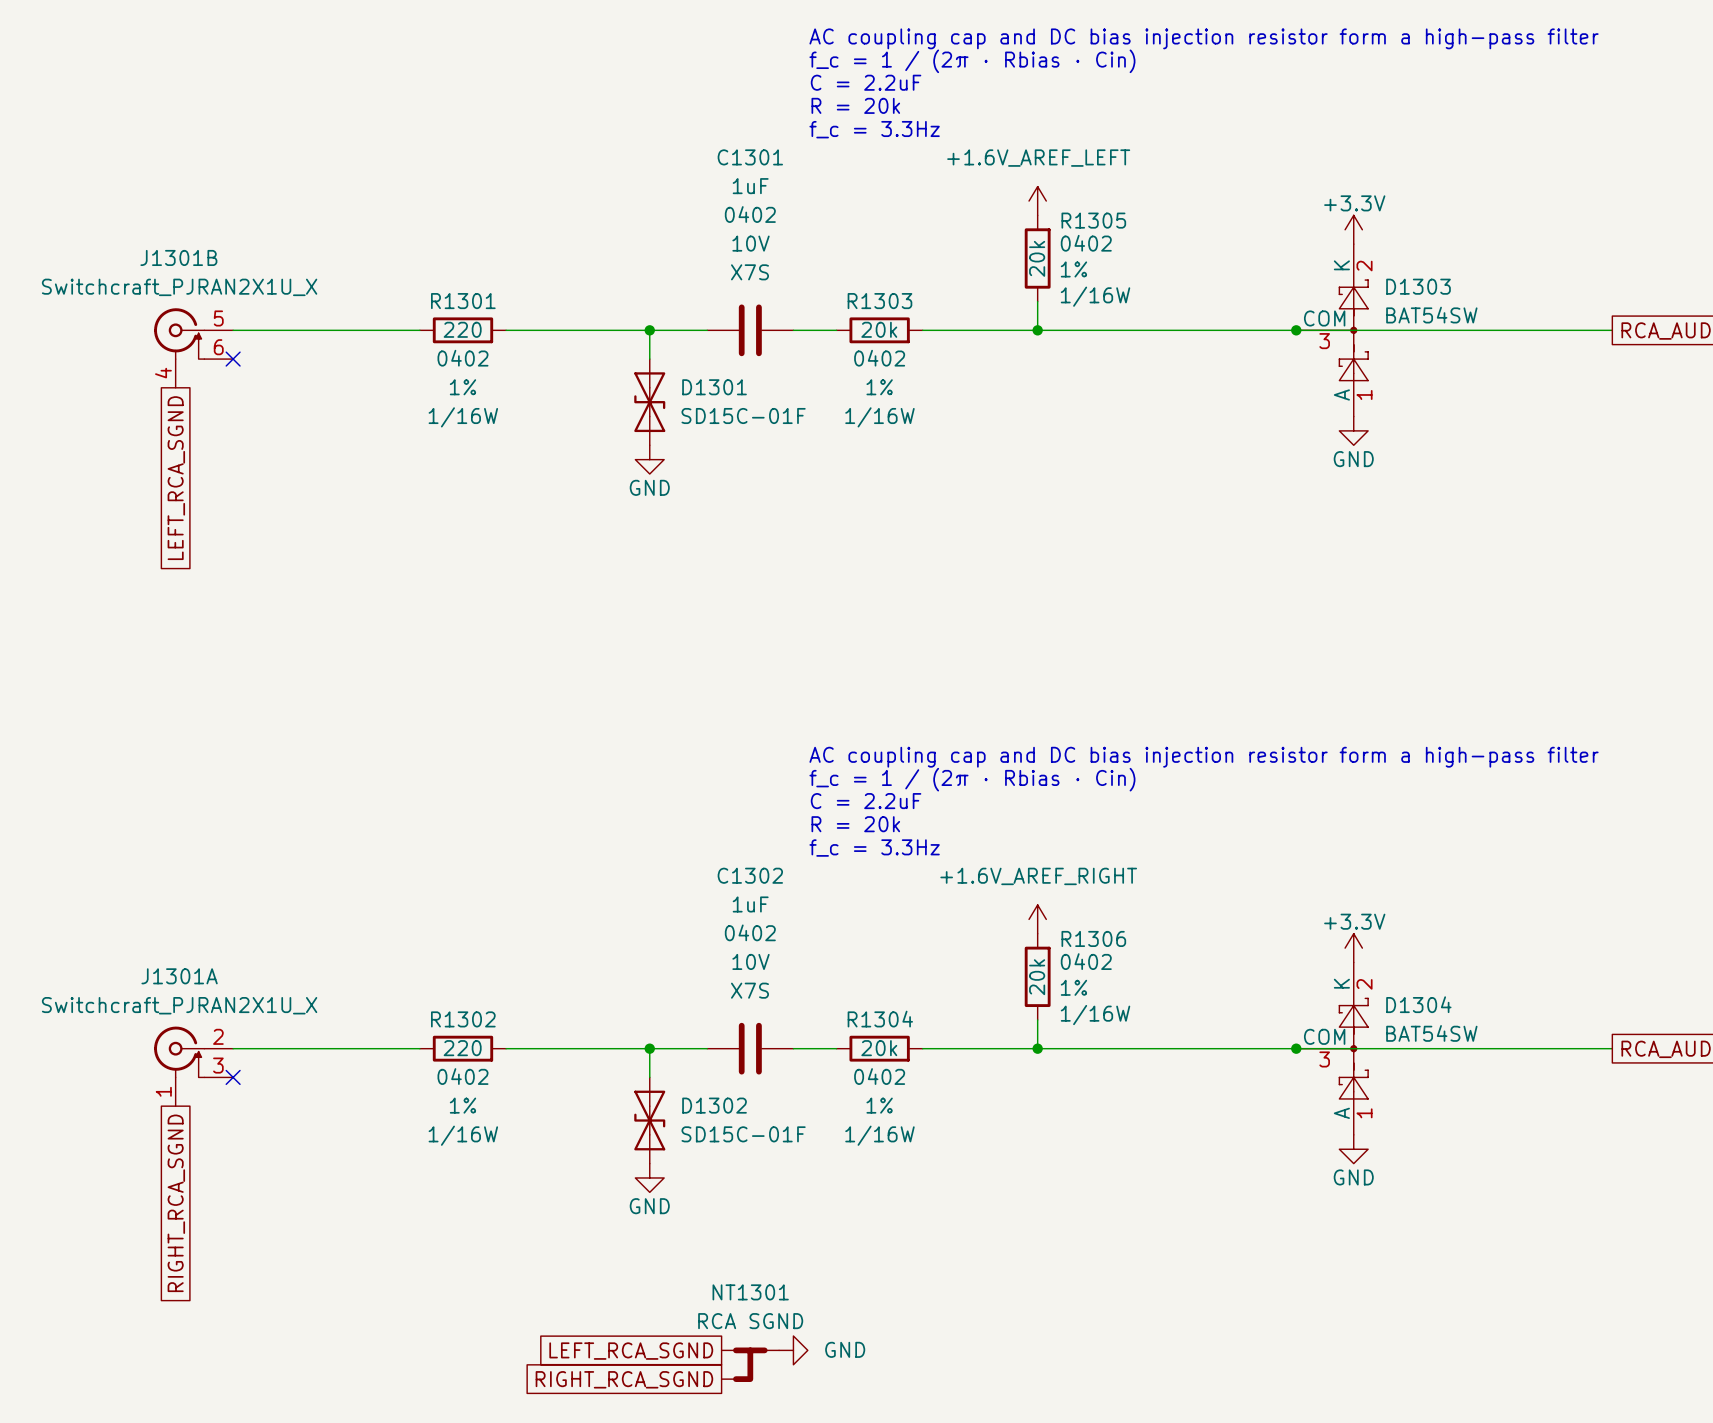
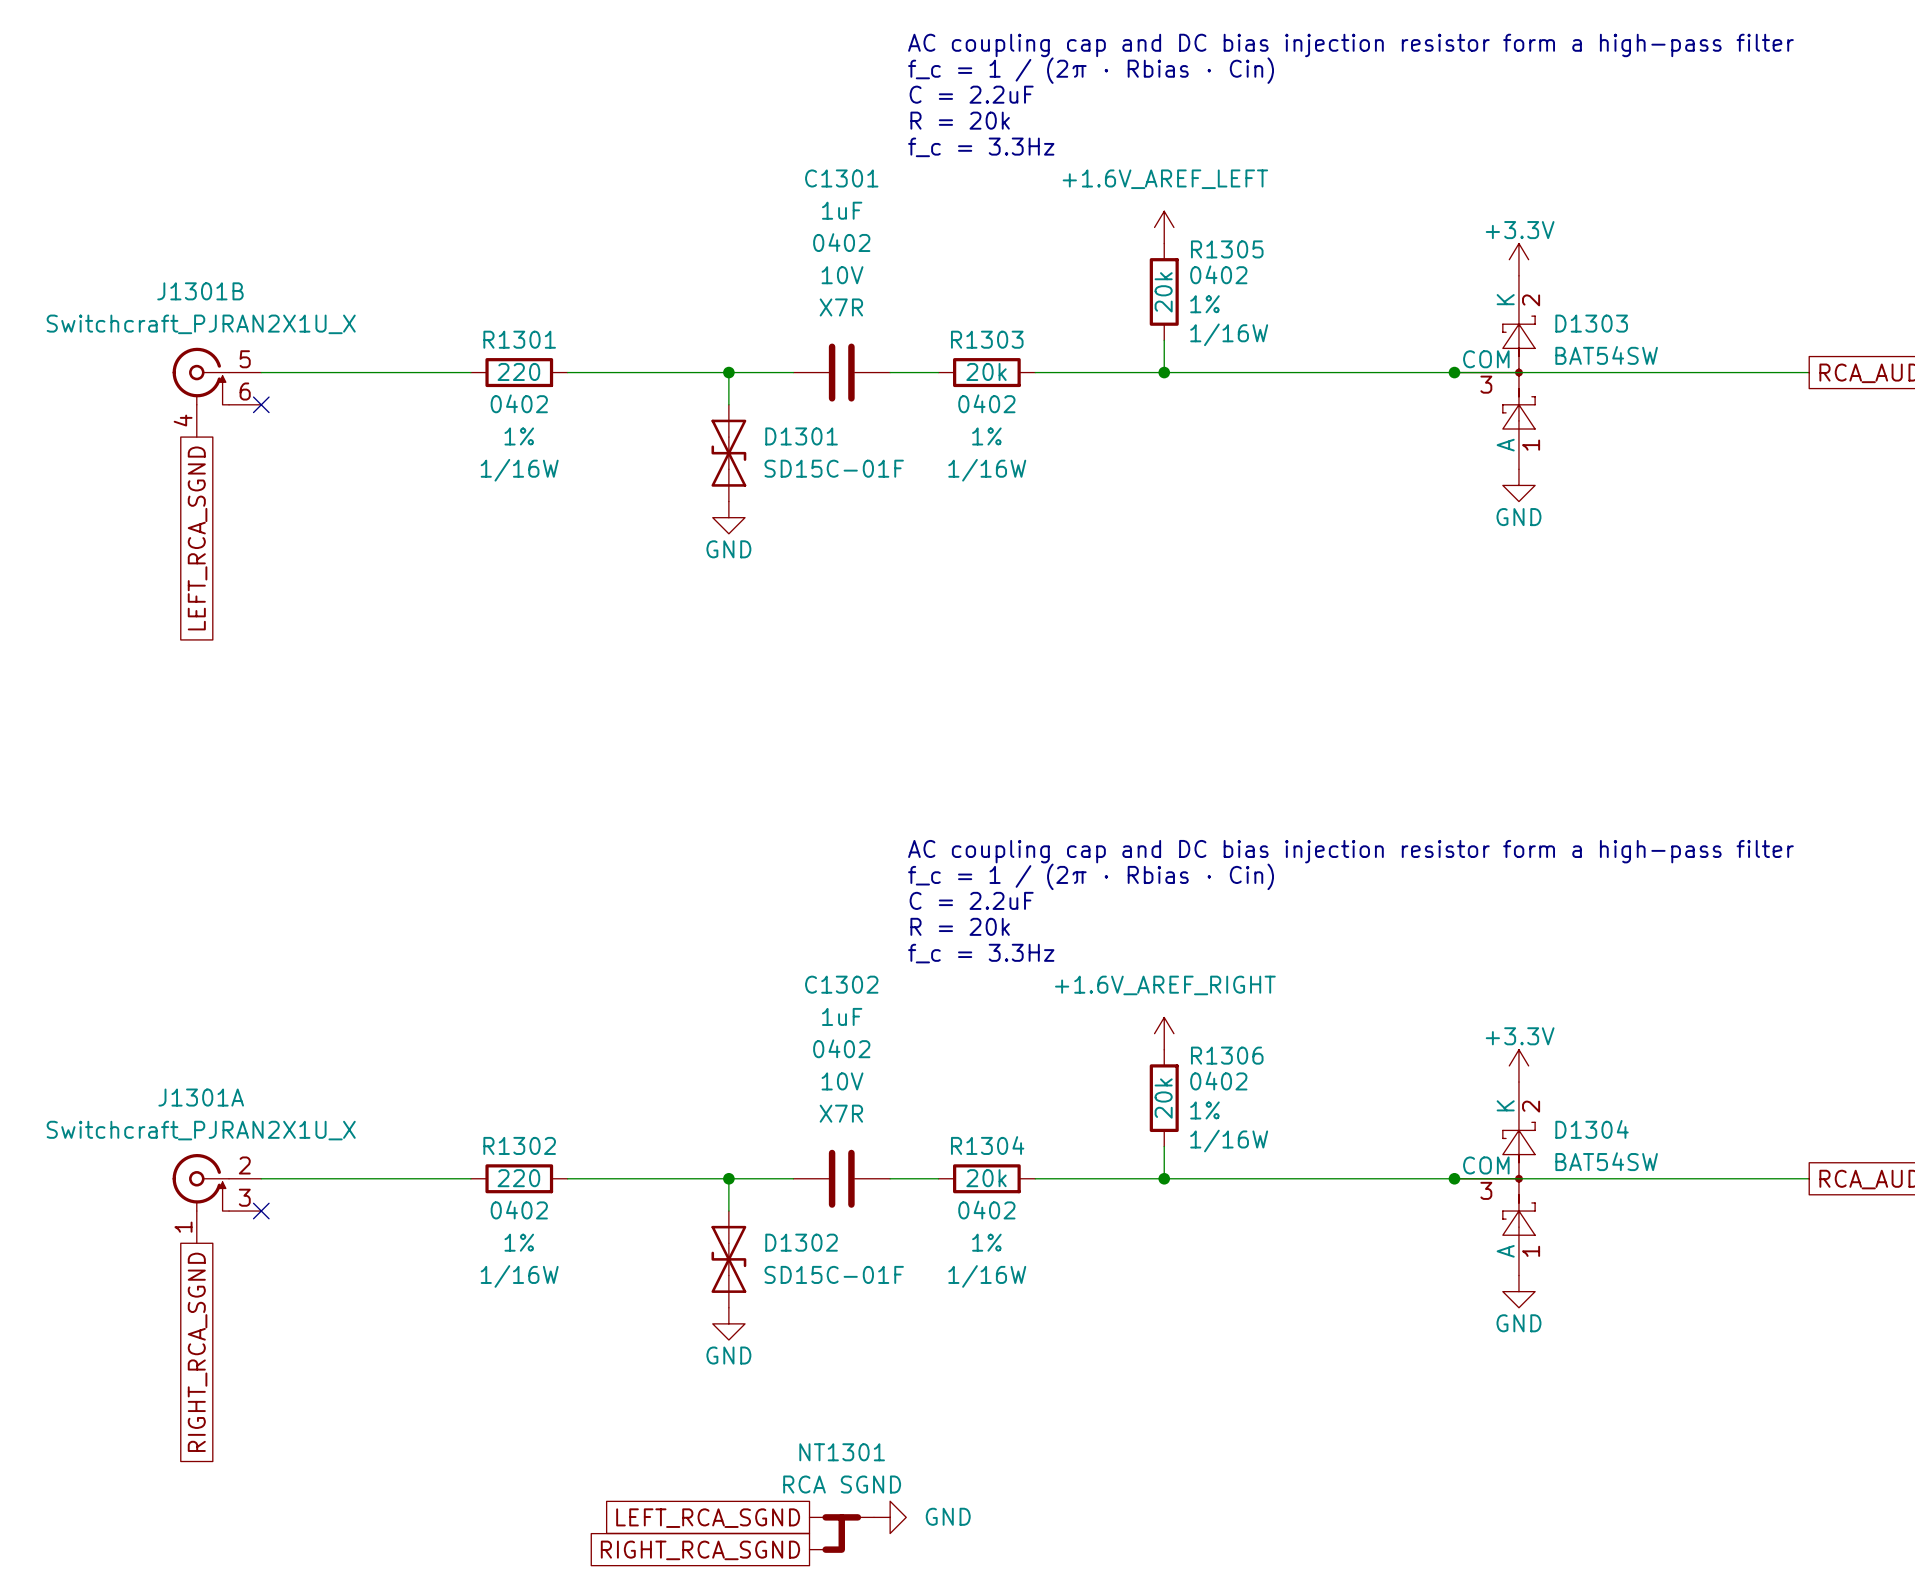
C1301 text: X7S (749, 272) -> X7R (841, 307)
C1302 text: X7S (749, 990) -> X7R (841, 1113)

